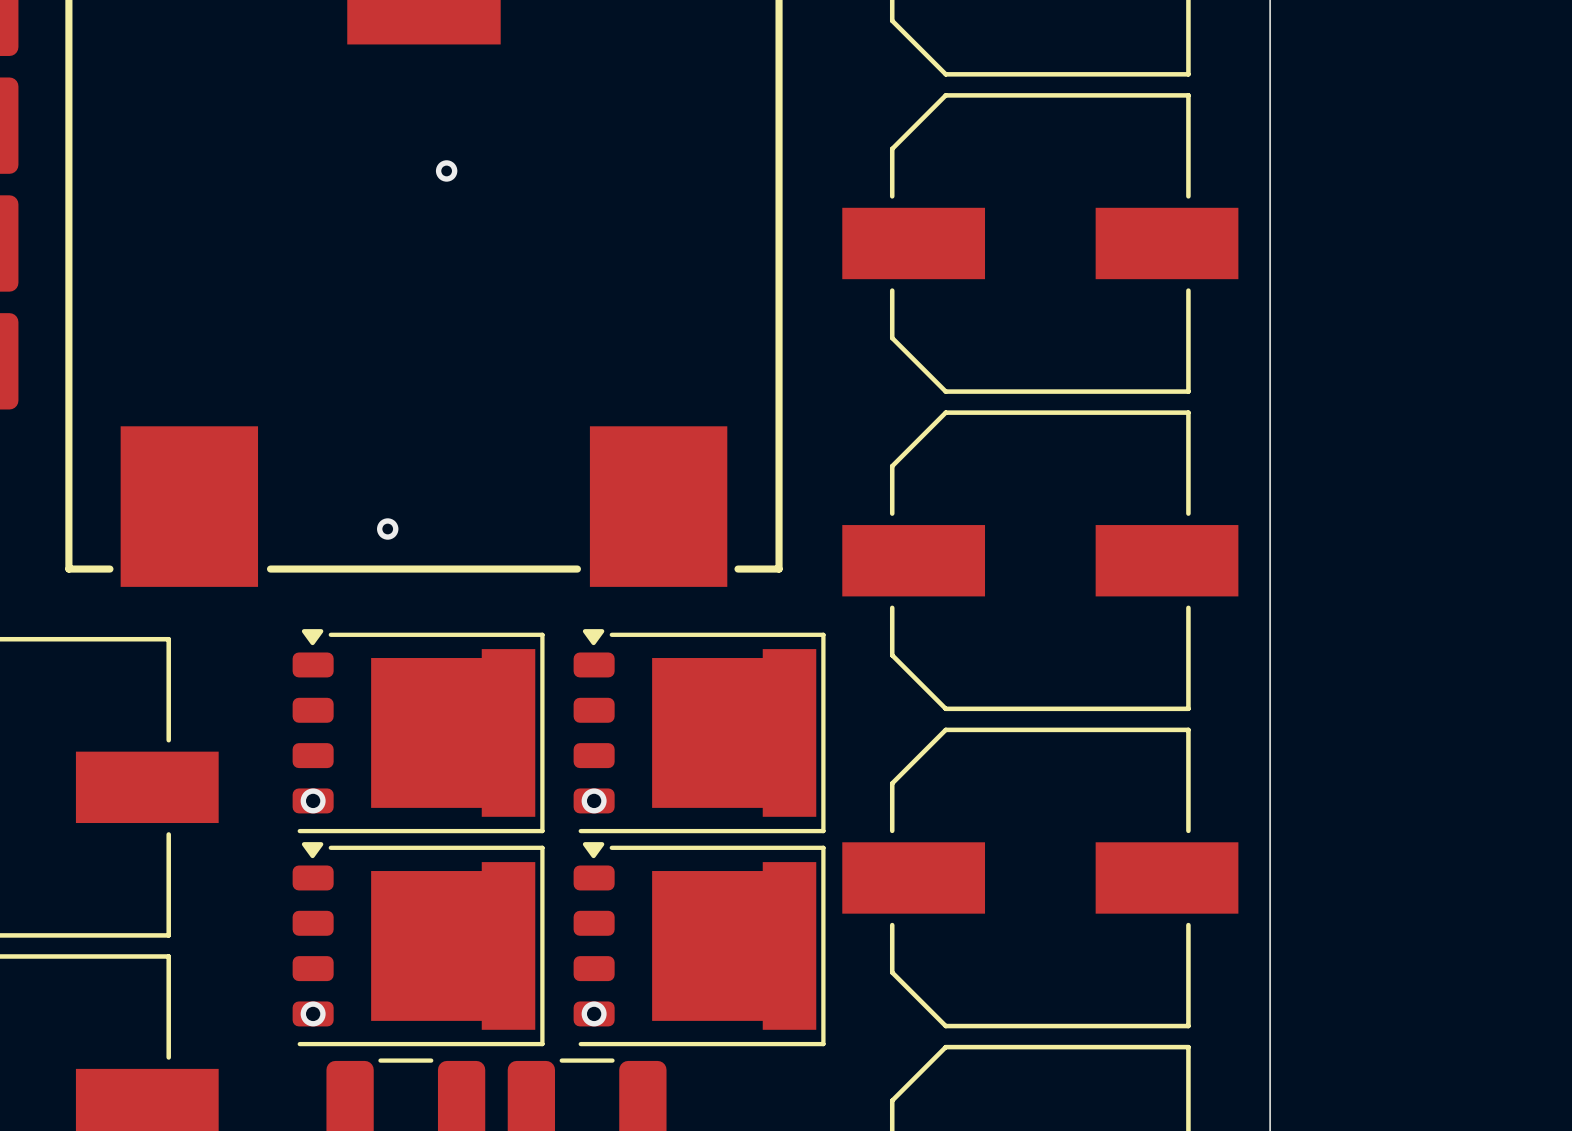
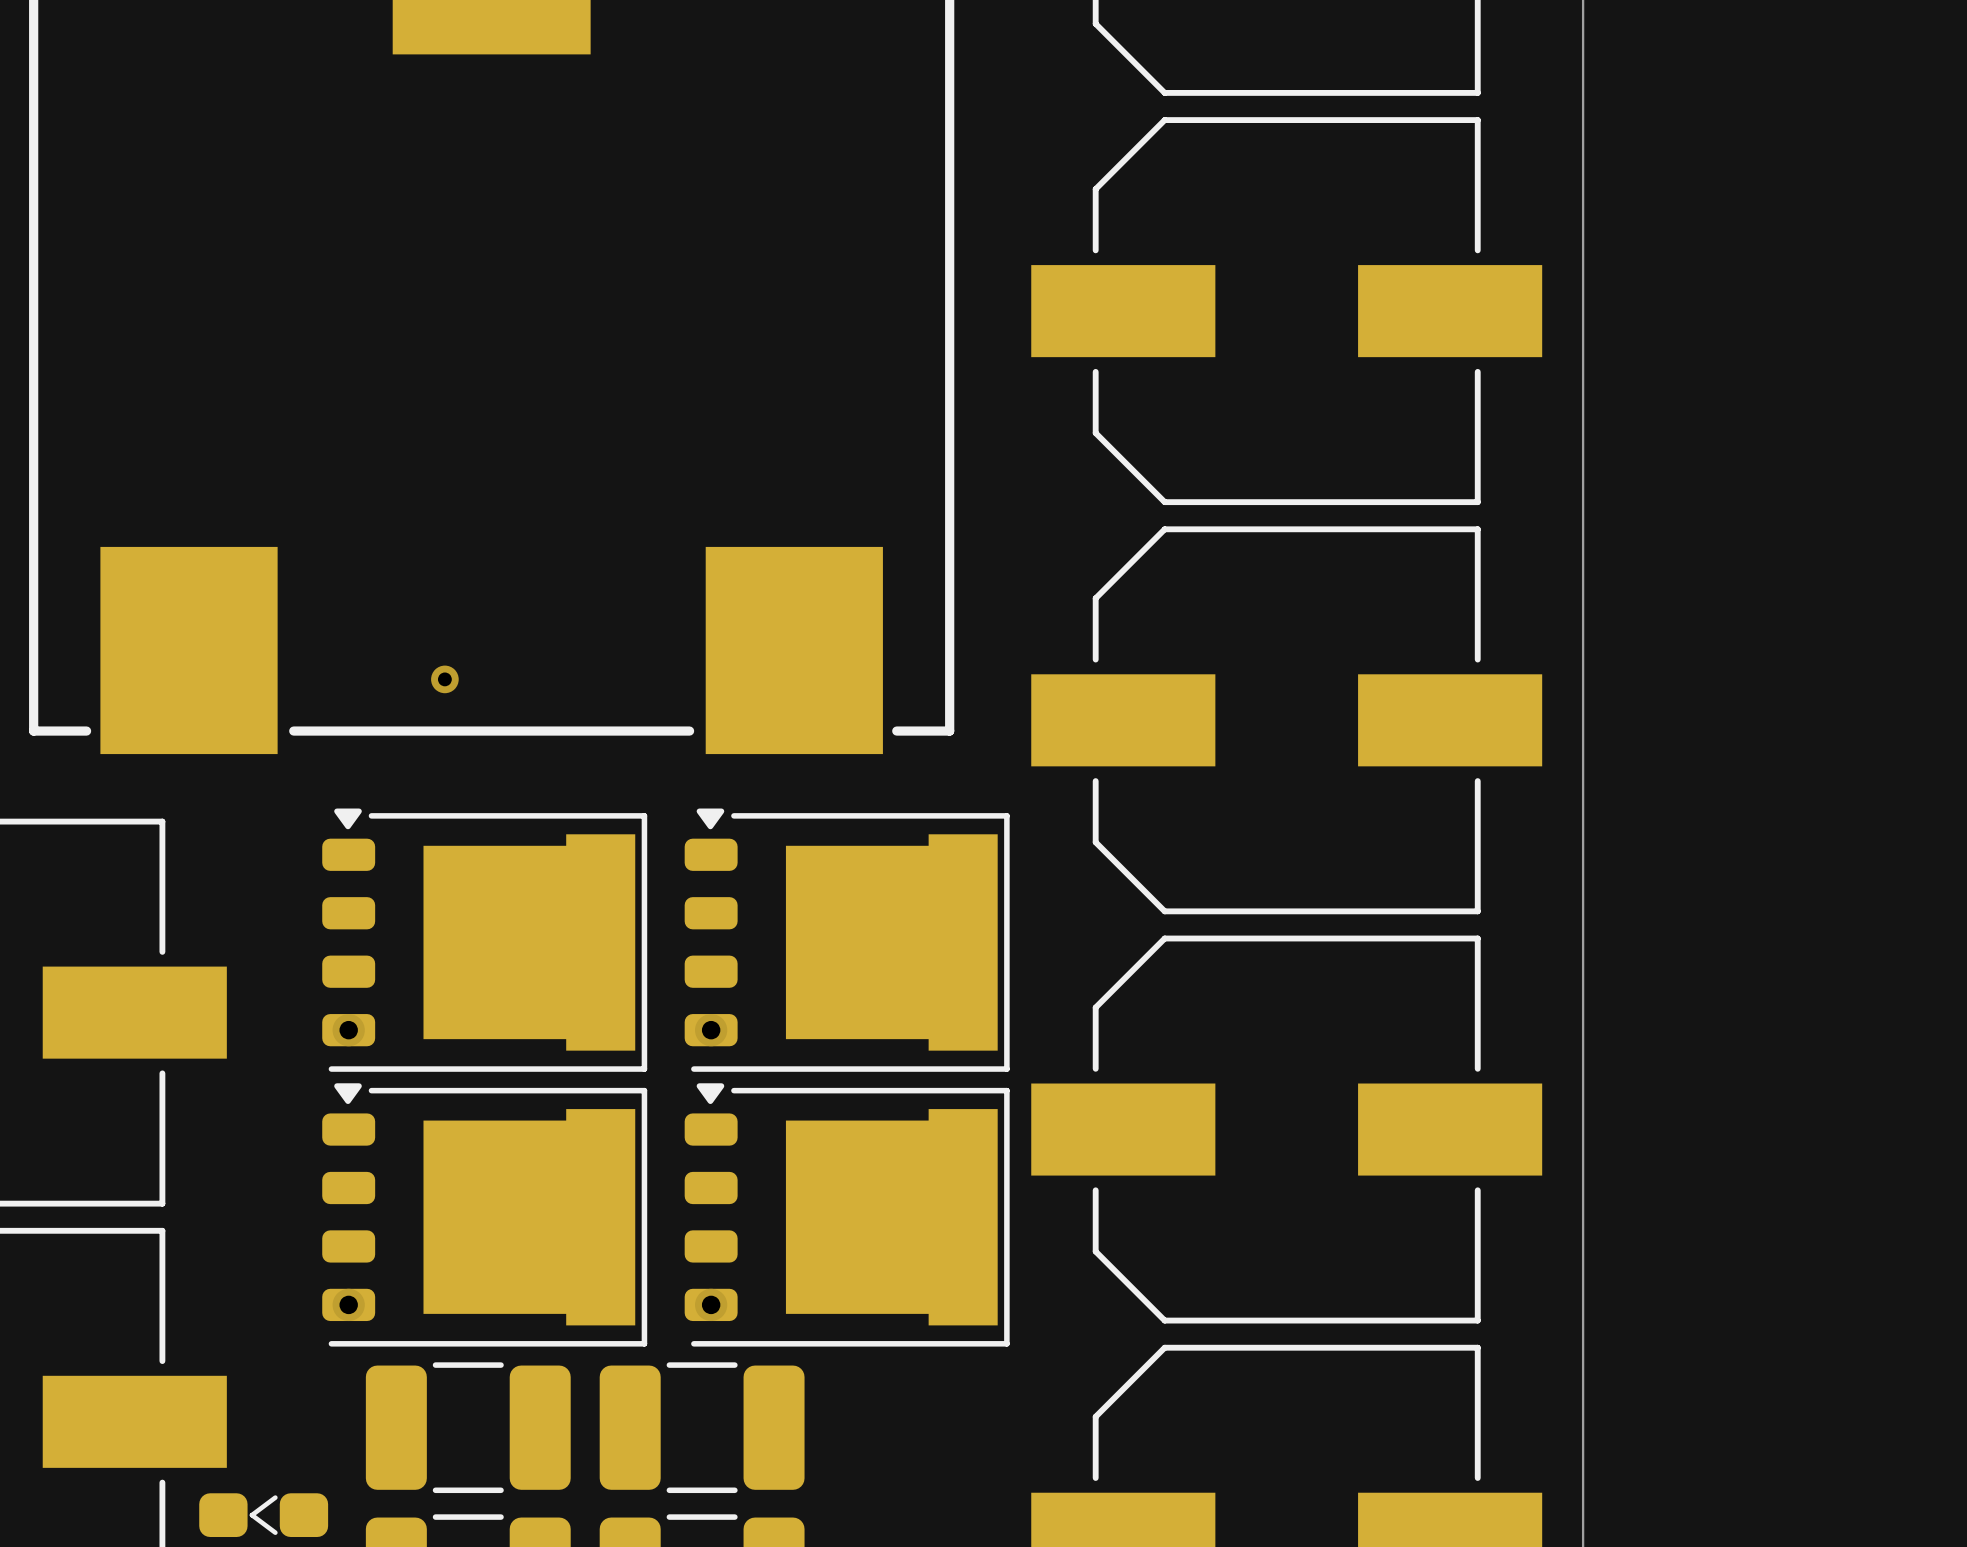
via: (446, 170) -> none

